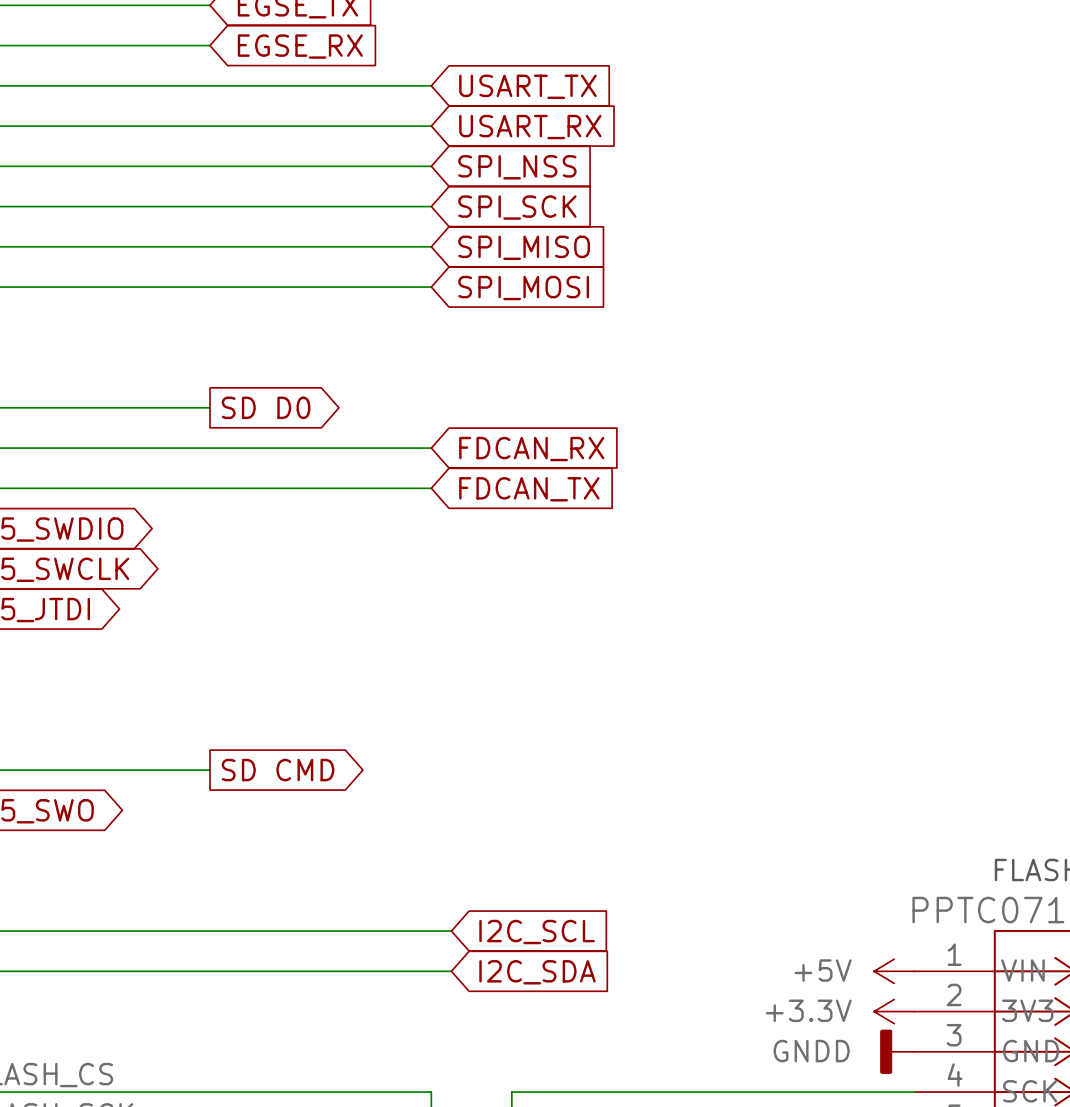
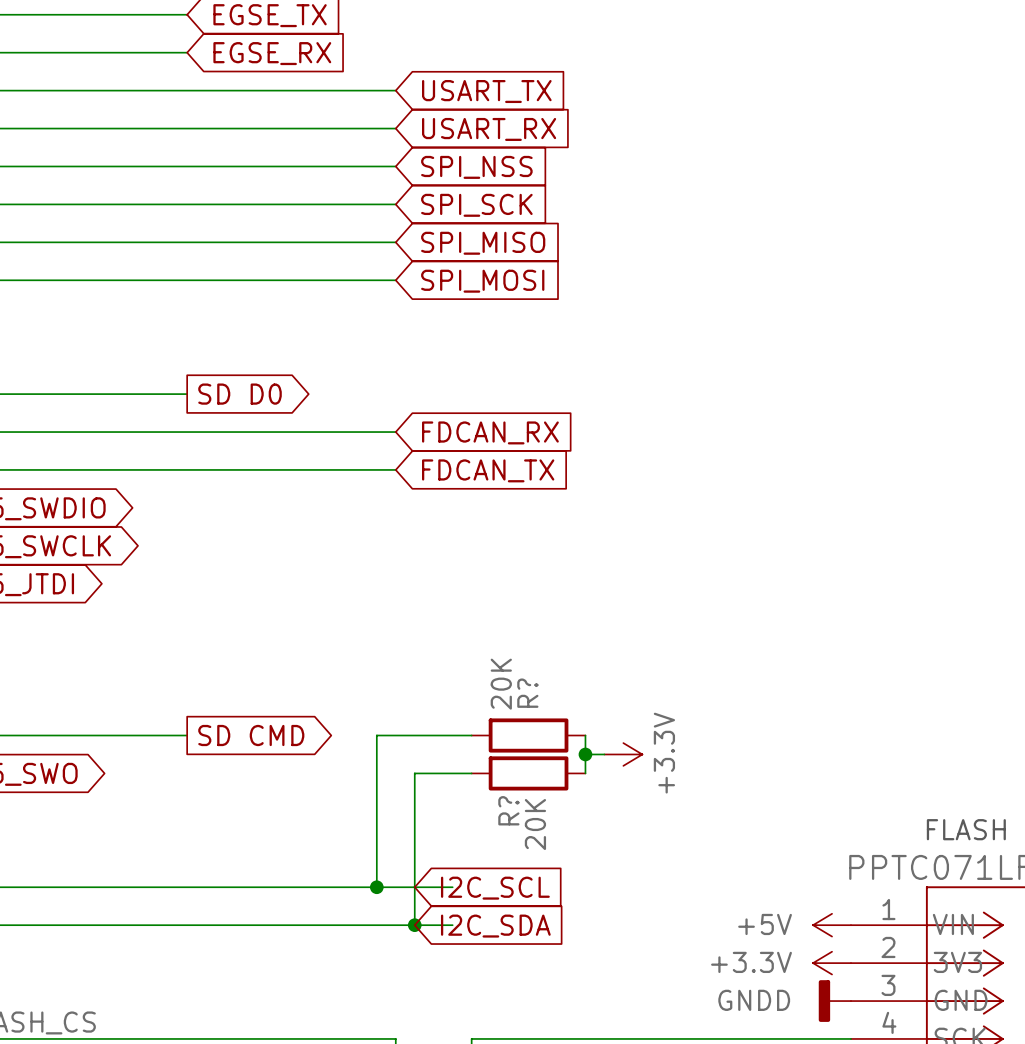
wire: none -> (471, 735) (376, 735) (376, 887)
R?: none -> 20K (528, 735)
wire: none -> (585, 735) (585, 773)
wire: none -> (585, 754) (604, 754)
junction: none -> (585, 754)
power symbol: none -> +3.3V (623, 754)
wire: none -> (471, 773) (414, 773) (414, 925) (452, 925)
R?: none -> 20K (528, 773)
junction: none -> (376, 887)
wire: none -> (414, 887) (452, 887)
junction: none -> (414, 925)

